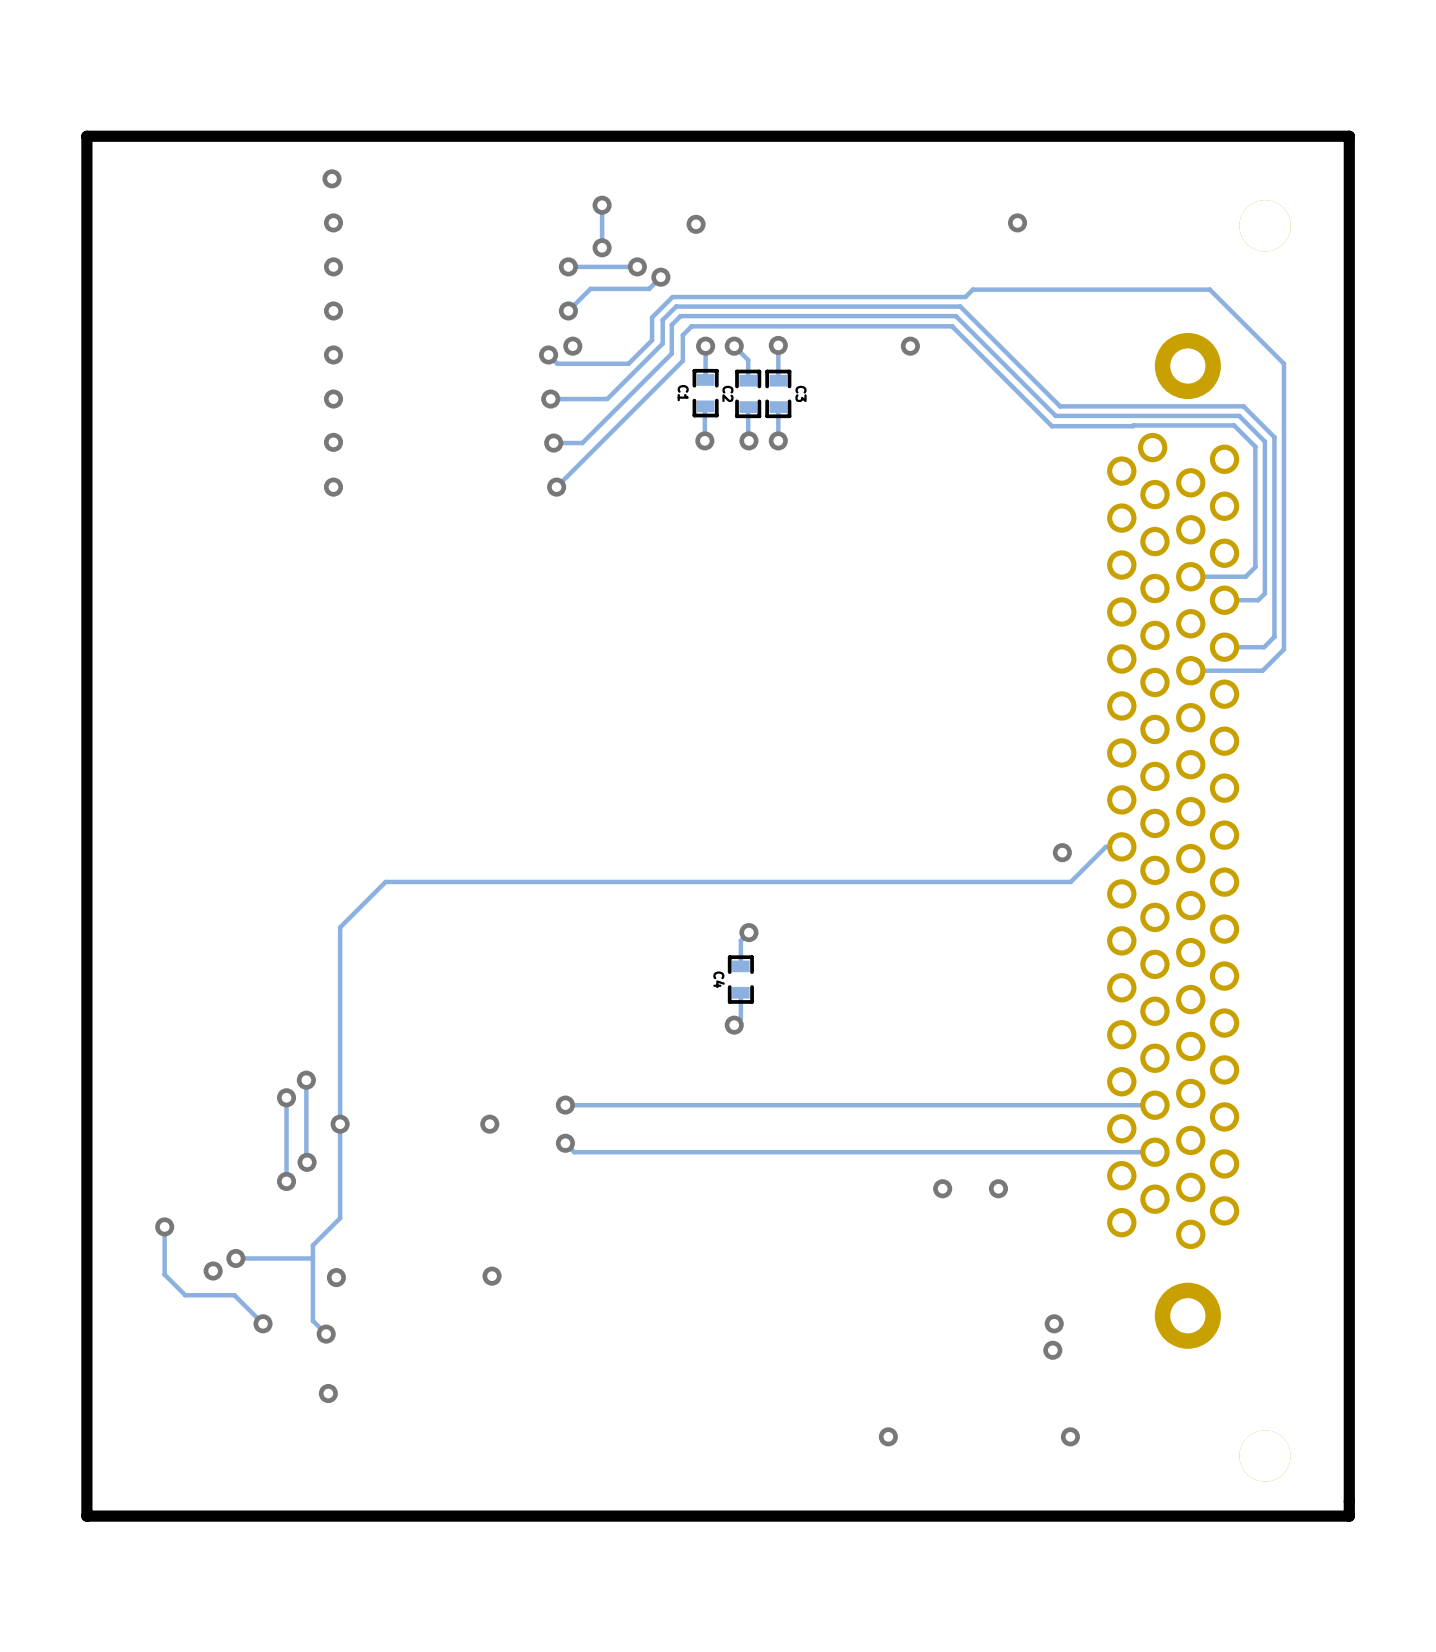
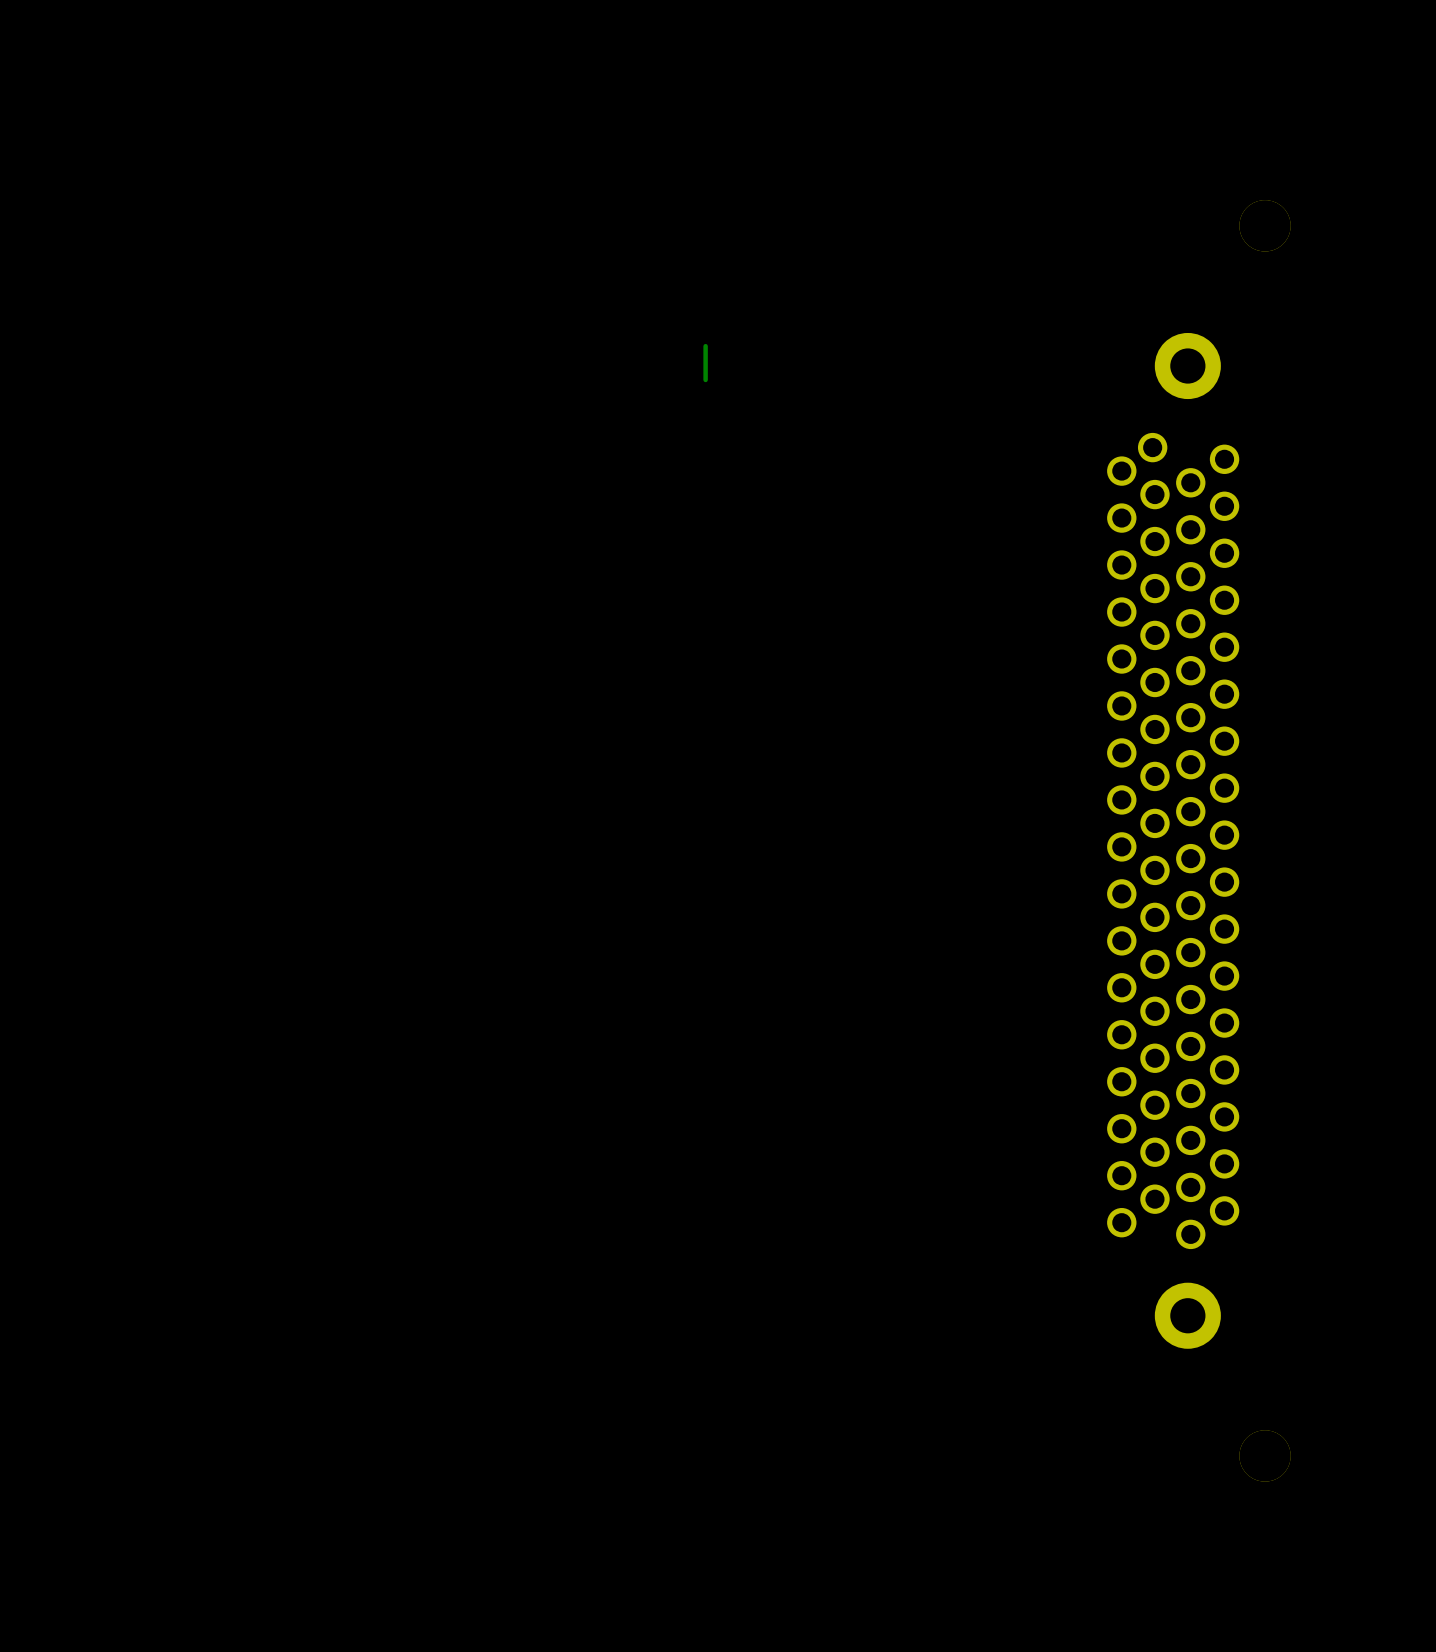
board edge: (1349, 136) (86, 136) (86, 1516) (1349, 1516) (1349, 136) -> none
via: (332, 178) -> none
track: (602, 205) (602, 247) -> none
via: (602, 205) -> none
via: (333, 222) -> none
via: (1017, 222) -> none
via: (696, 224) -> none
via: (602, 247) -> none
via: (333, 266) -> none
via: (568, 266) -> none
track: (637, 266) (568, 266) -> none
via: (637, 266) -> none
track: (660, 277) (649, 288) (590, 288) (568, 310) -> none
via: (660, 277) -> none
via: (333, 310) -> none
via: (568, 310) -> none
track: (778, 345) (778, 380) -> none
via: (778, 345) -> none
via: (572, 346) -> none
via: (705, 346) -> none
track: (734, 346) (748, 360) (748, 380) -> none
via: (734, 346) -> none
via: (910, 346) -> none
via: (333, 354) -> none
track: (548, 354) (557, 363) (628, 363) (652, 340) (652, 317) (672, 297) (965, 297) (972, 289) (1209, 289) (1283, 363) (1283, 649) (1262, 670) (1190, 670) -> none
via: (548, 354) -> none
C1: (705, 393) -> none
C2: (748, 393) -> none
C3: (778, 393) -> none
via: (333, 399) -> none
track: (550, 399) (607, 399) (662, 343) (662, 320) (676, 306) (960, 306) (1060, 406) (1243, 406) (1274, 437) (1274, 636) (1264, 647) (1224, 647) -> none
via: (550, 399) -> none
track: (705, 406) (704, 440) -> none
track: (748, 407) (748, 440) -> none
track: (778, 407) (778, 440) -> none
via: (704, 440) -> none
via: (748, 440) -> none
via: (778, 440) -> none
via: (333, 442) -> none
track: (553, 443) (582, 443) (671, 353) (671, 324) (680, 316) (955, 316) (1055, 415) (1239, 415) (1264, 441) (1264, 593) (1258, 600) (1224, 600) -> none
via: (553, 443) -> none
via: (333, 487) -> none
track: (556, 487) (682, 360) (682, 335) (691, 326) (952, 326) (1051, 426) (1234, 425) (1255, 446) (1255, 567) (1245, 576) (1190, 576) -> none
via: (556, 487) -> none
track: (1121, 846) (1105, 846) (1070, 881) (385, 881) (340, 927) (340, 1218) (312, 1245) (312, 1320) (326, 1334) -> none
via: (1062, 852) -> none
track: (748, 932) (740, 940) (740, 966) -> none
via: (748, 932) -> none
C4: (740, 979) -> none
track: (740, 992) (740, 1018) (734, 1025) -> none
via: (734, 1025) -> none
track: (306, 1080) (307, 1162) -> none
via: (306, 1080) -> none
track: (286, 1097) (286, 1181) -> none
via: (286, 1097) -> none
via: (565, 1105) -> none
track: (1154, 1105) (565, 1105) -> none
via: (340, 1124) -> none
via: (489, 1124) -> none
track: (565, 1143) (574, 1152) (1154, 1152) -> none
via: (565, 1143) -> none
via: (307, 1162) -> none
via: (286, 1181) -> none
via: (942, 1188) -> none
via: (998, 1188) -> none
track: (164, 1226) (164, 1274) (185, 1295) (234, 1295) (263, 1323) -> none
via: (164, 1226) -> none
via: (235, 1258) -> none
track: (312, 1258) (235, 1258) -> none
via: (213, 1271) -> none
via: (492, 1276) -> none
via: (336, 1277) -> none
via: (263, 1323) -> none
via: (1054, 1323) -> none
via: (326, 1334) -> none
via: (1052, 1350) -> none
via: (328, 1393) -> none
via: (888, 1436) -> none
via: (1070, 1436) -> none

